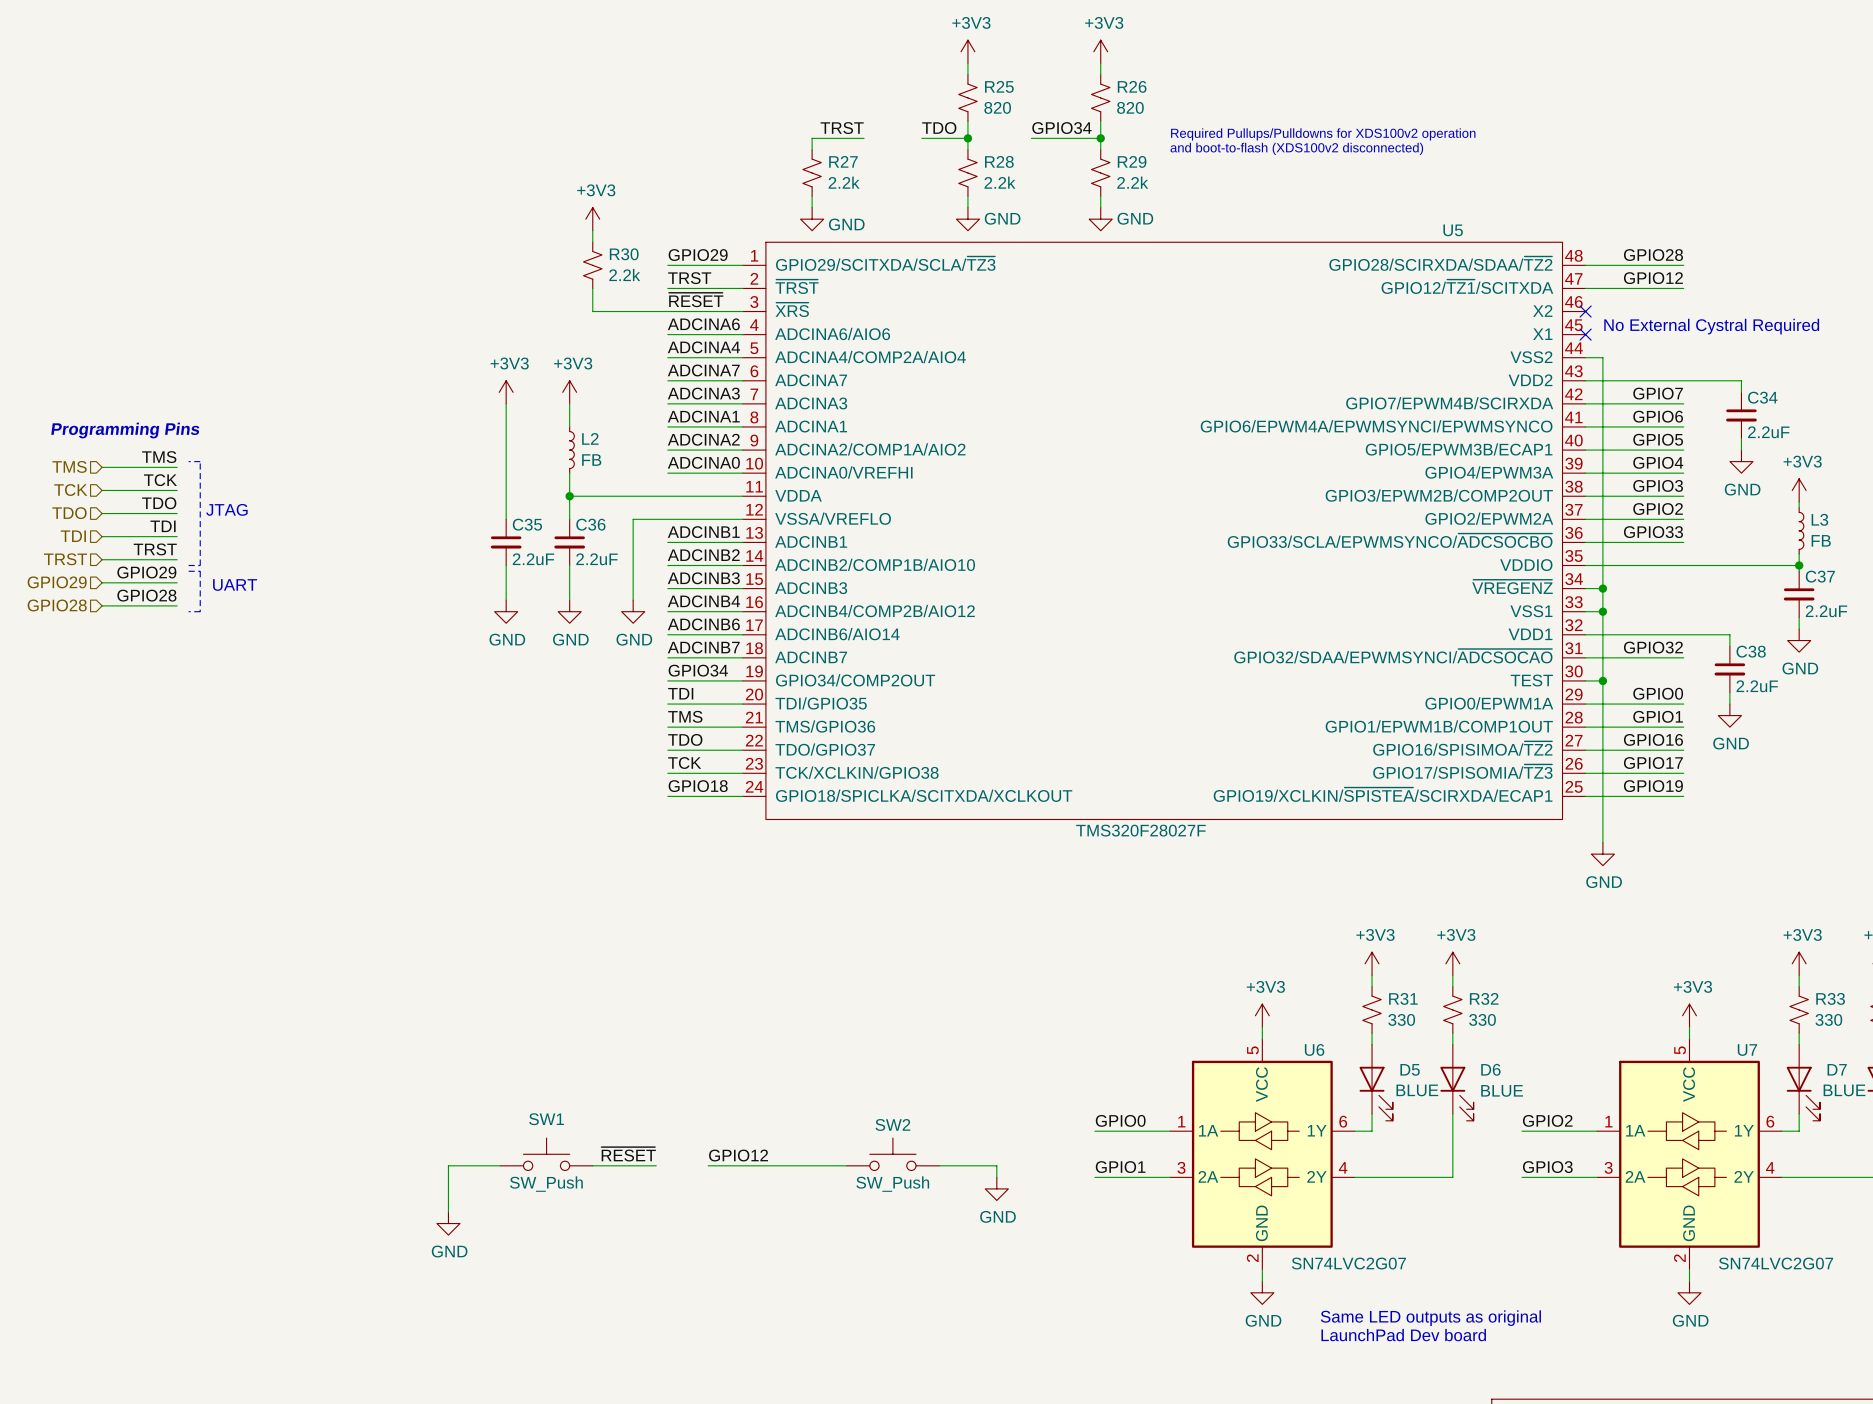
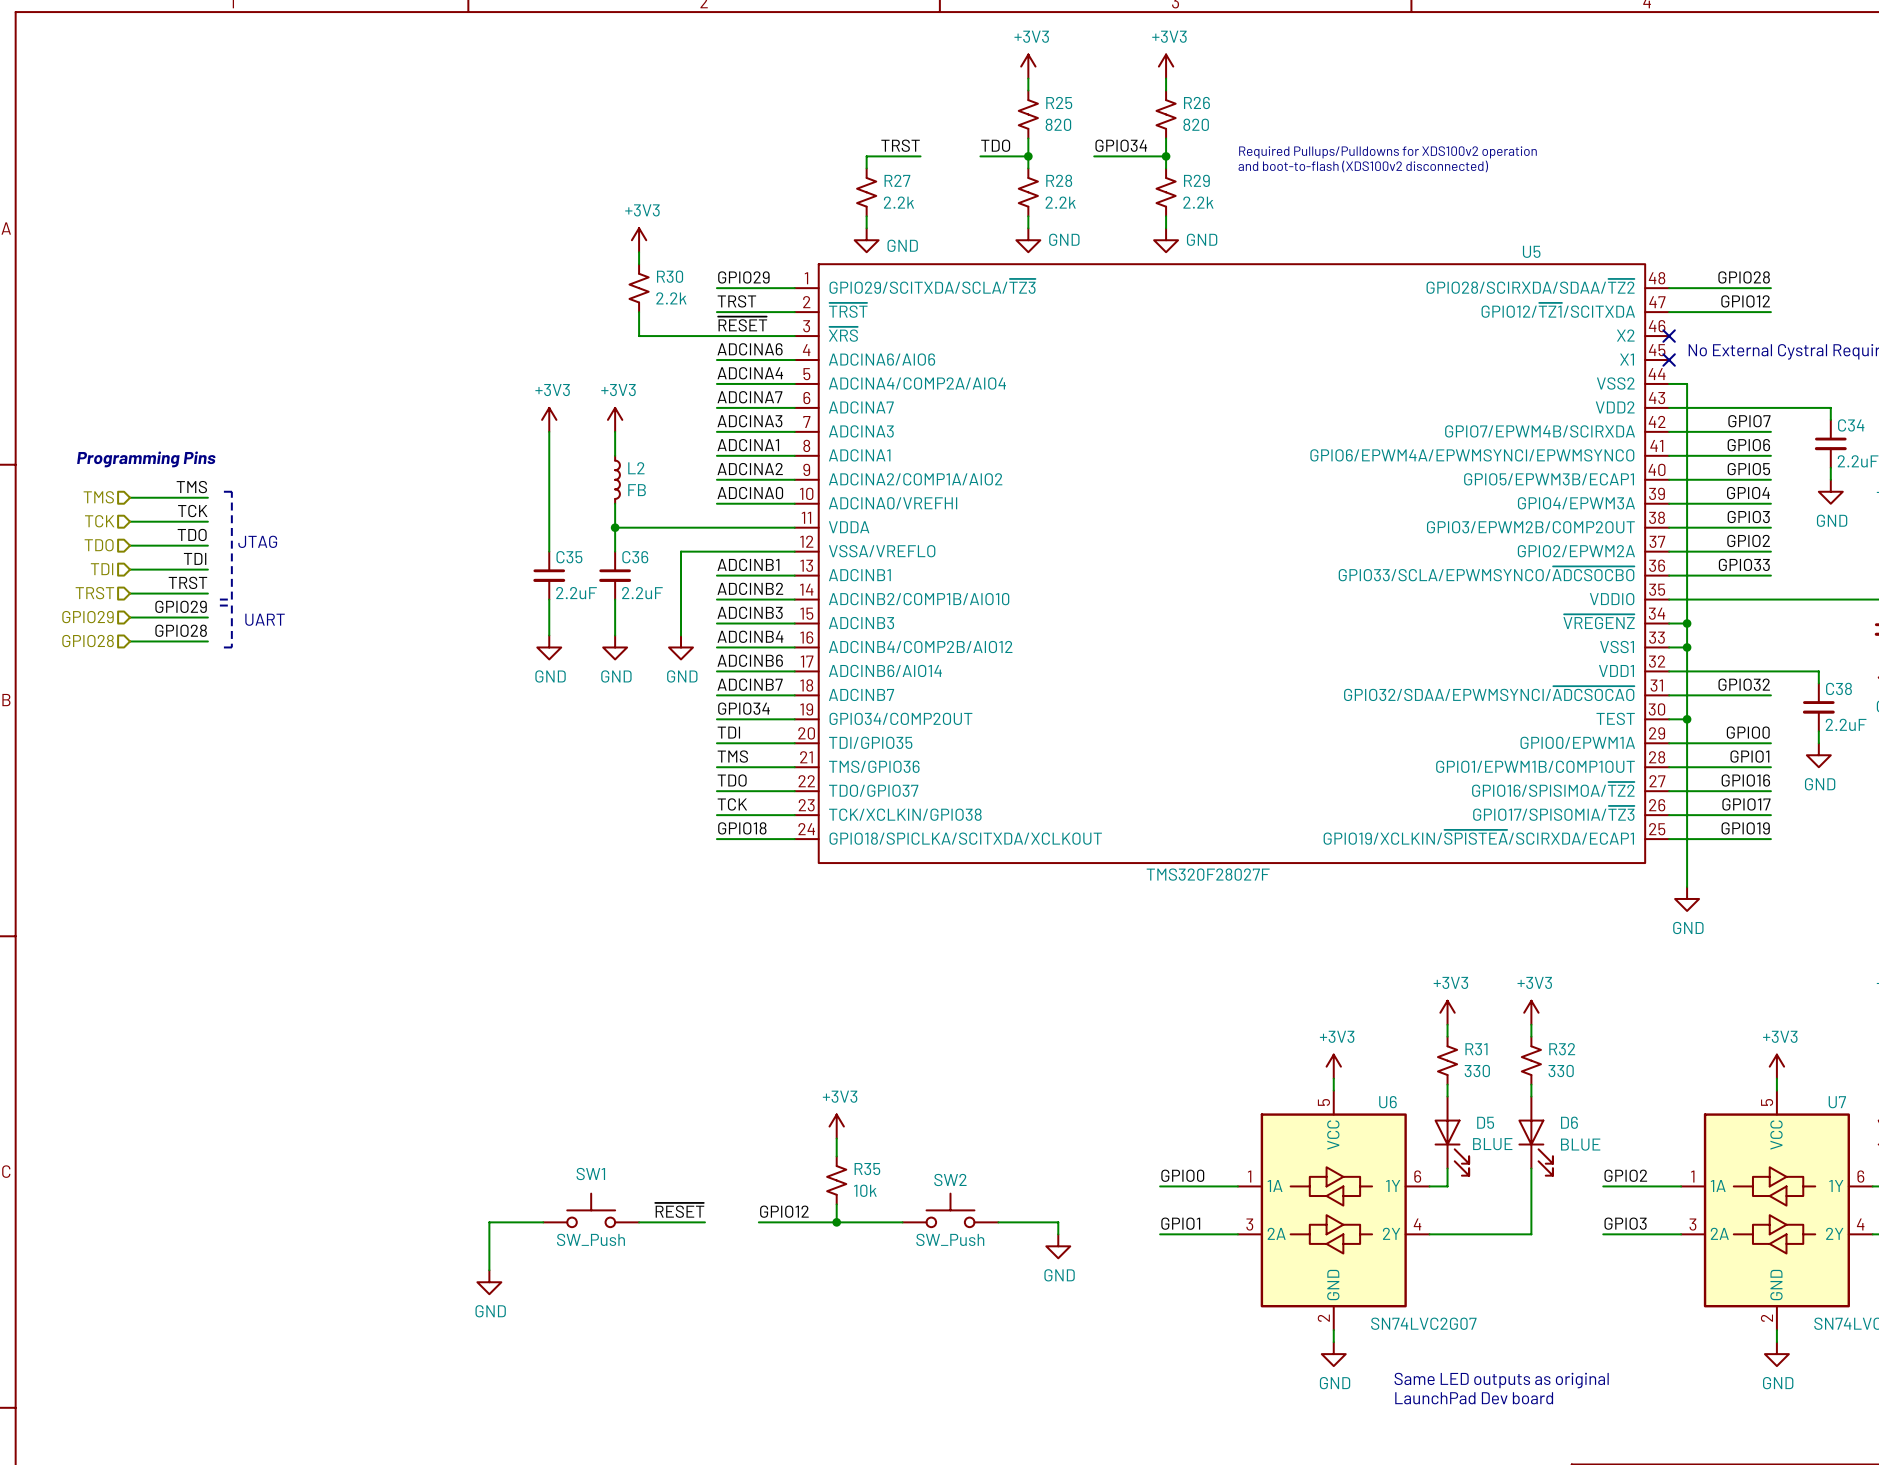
power symbol: none -> +3V3 (836, 1126)
wire: none -> (836, 1138) (836, 1156)
R35: none -> 10k (836, 1180)
wire: none -> (836, 1204) (836, 1222)
junction: none -> (836, 1222)

